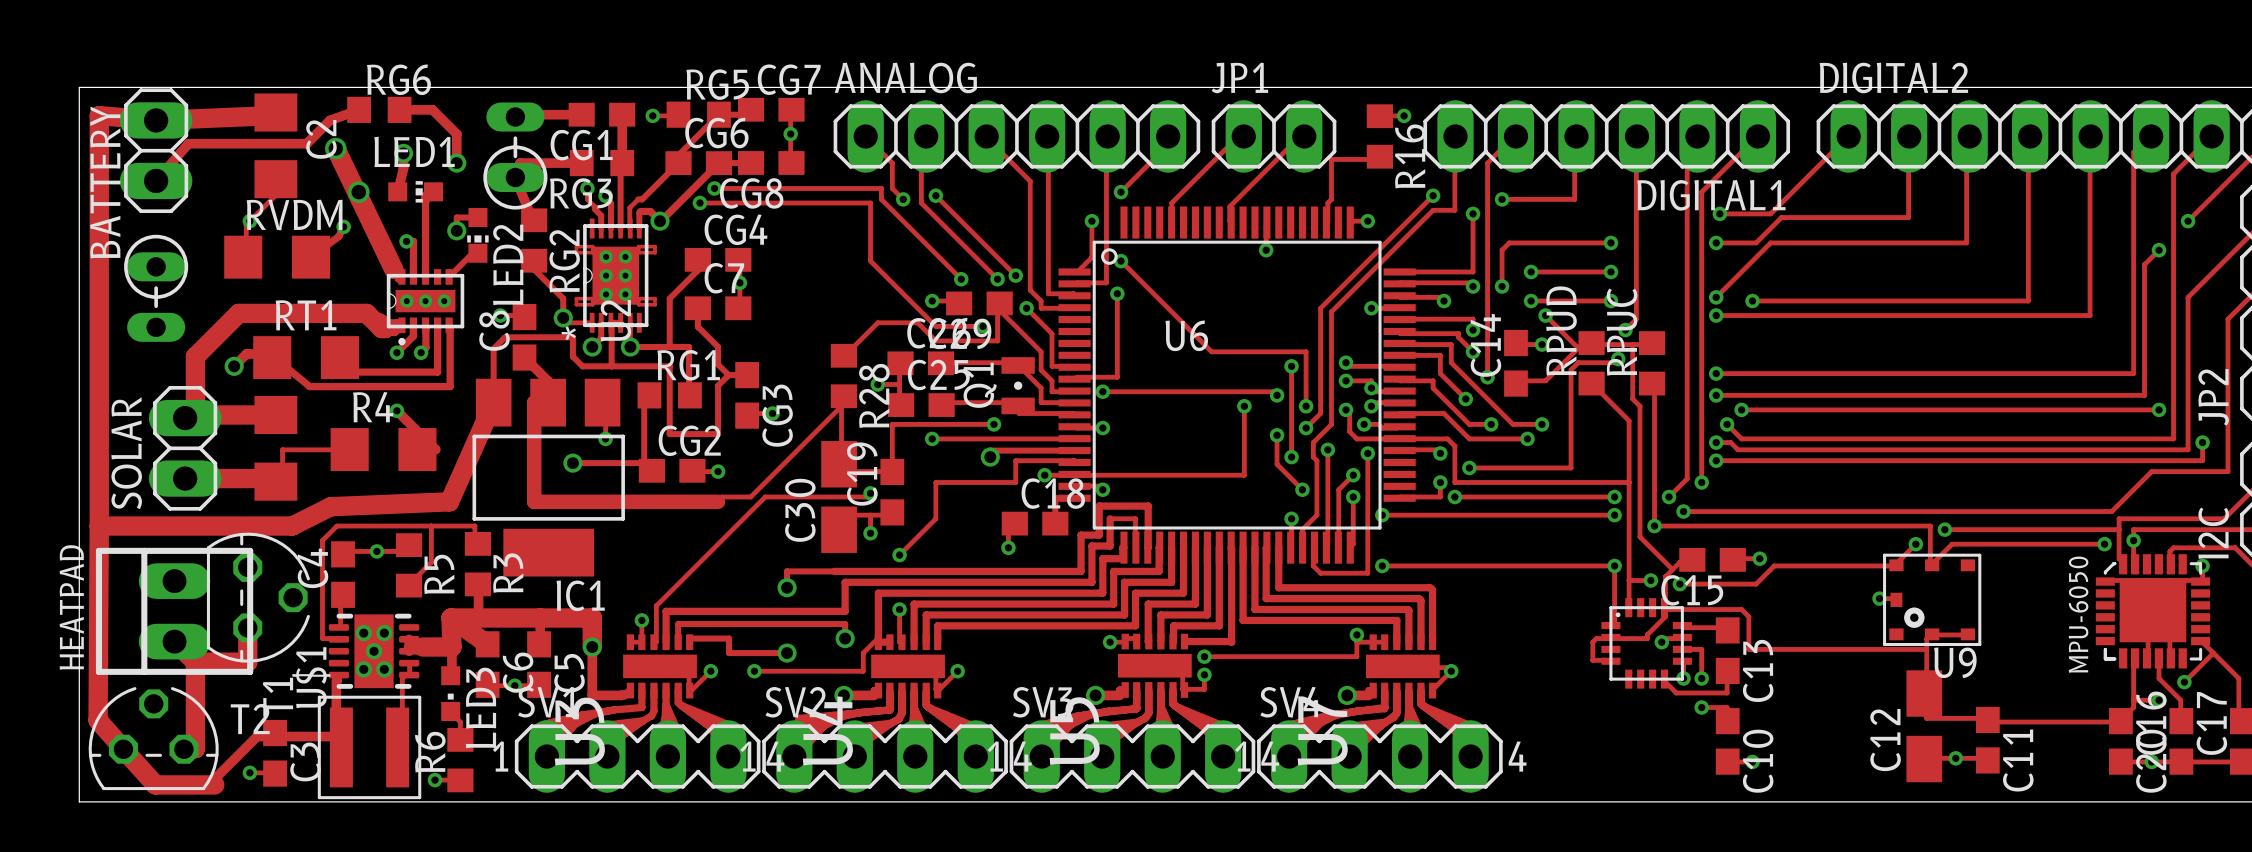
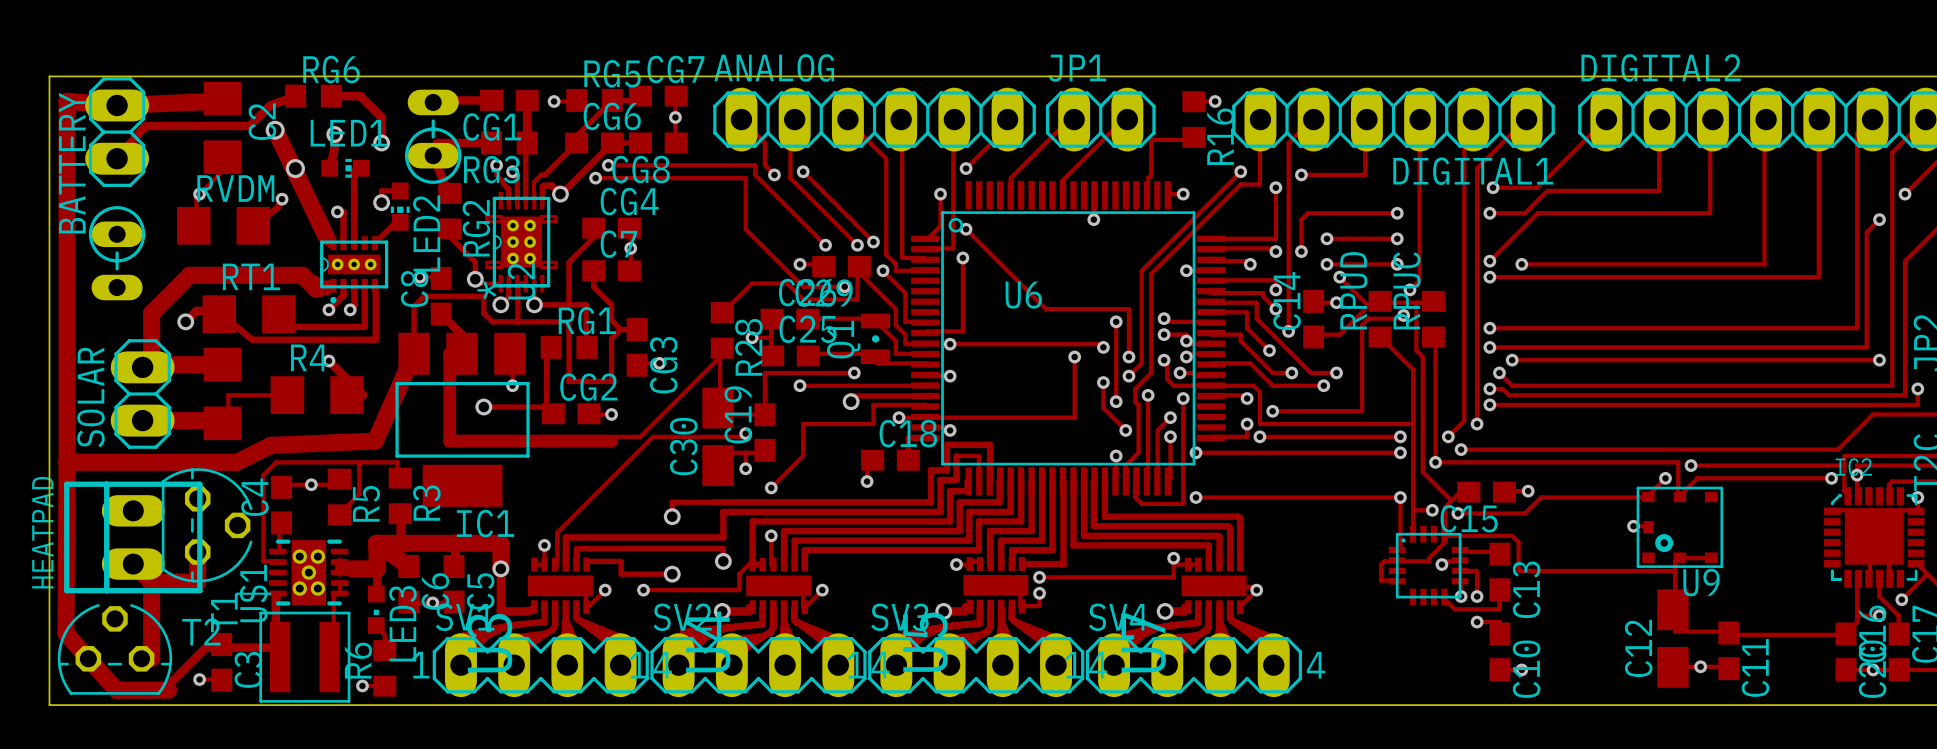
MPU-6050 name: MPU-6050 (2078, 614) -> IC2 (1853, 467)

